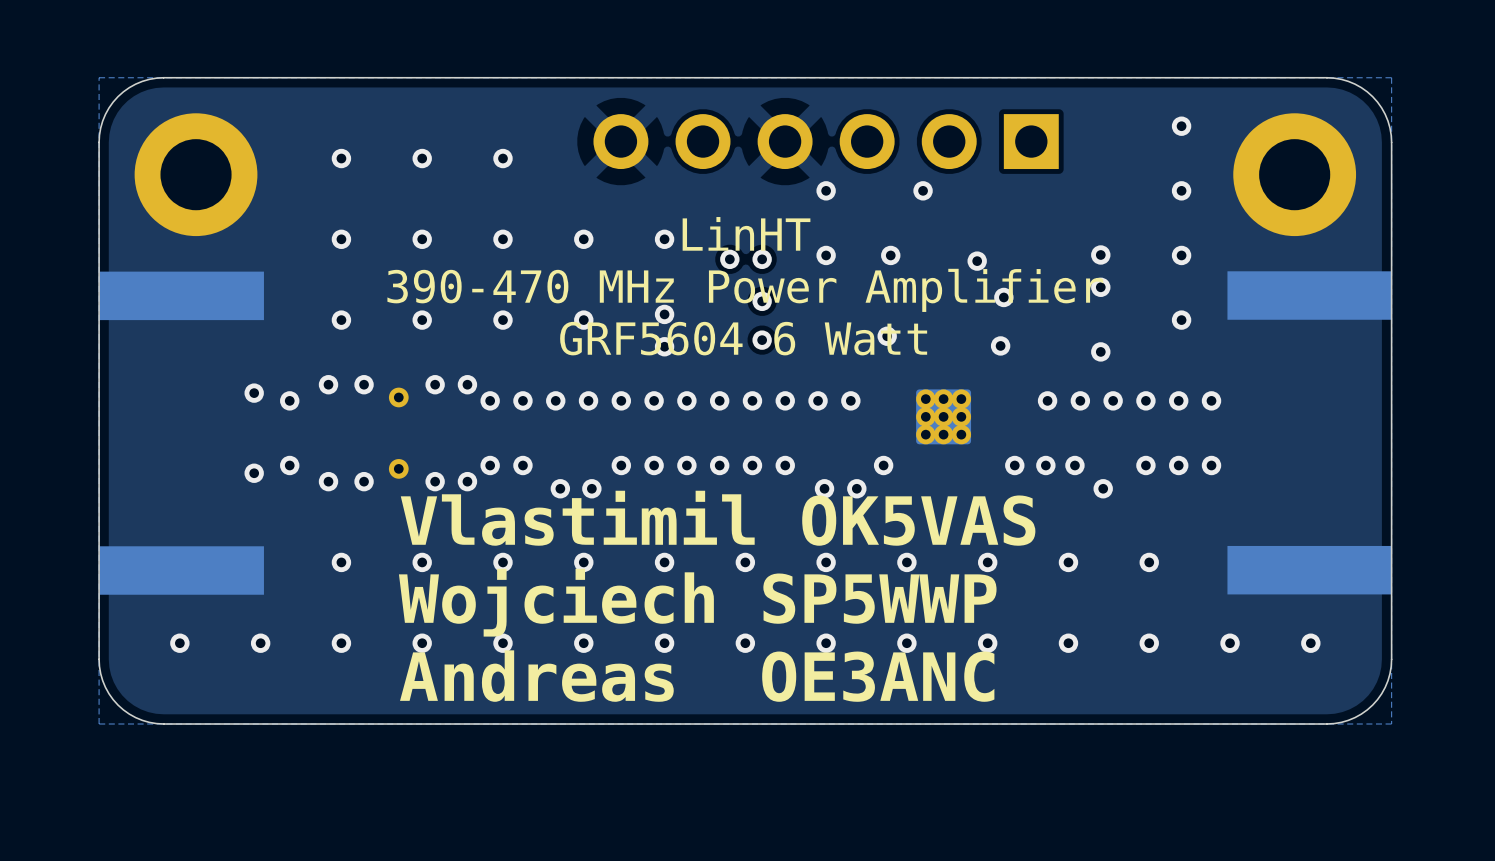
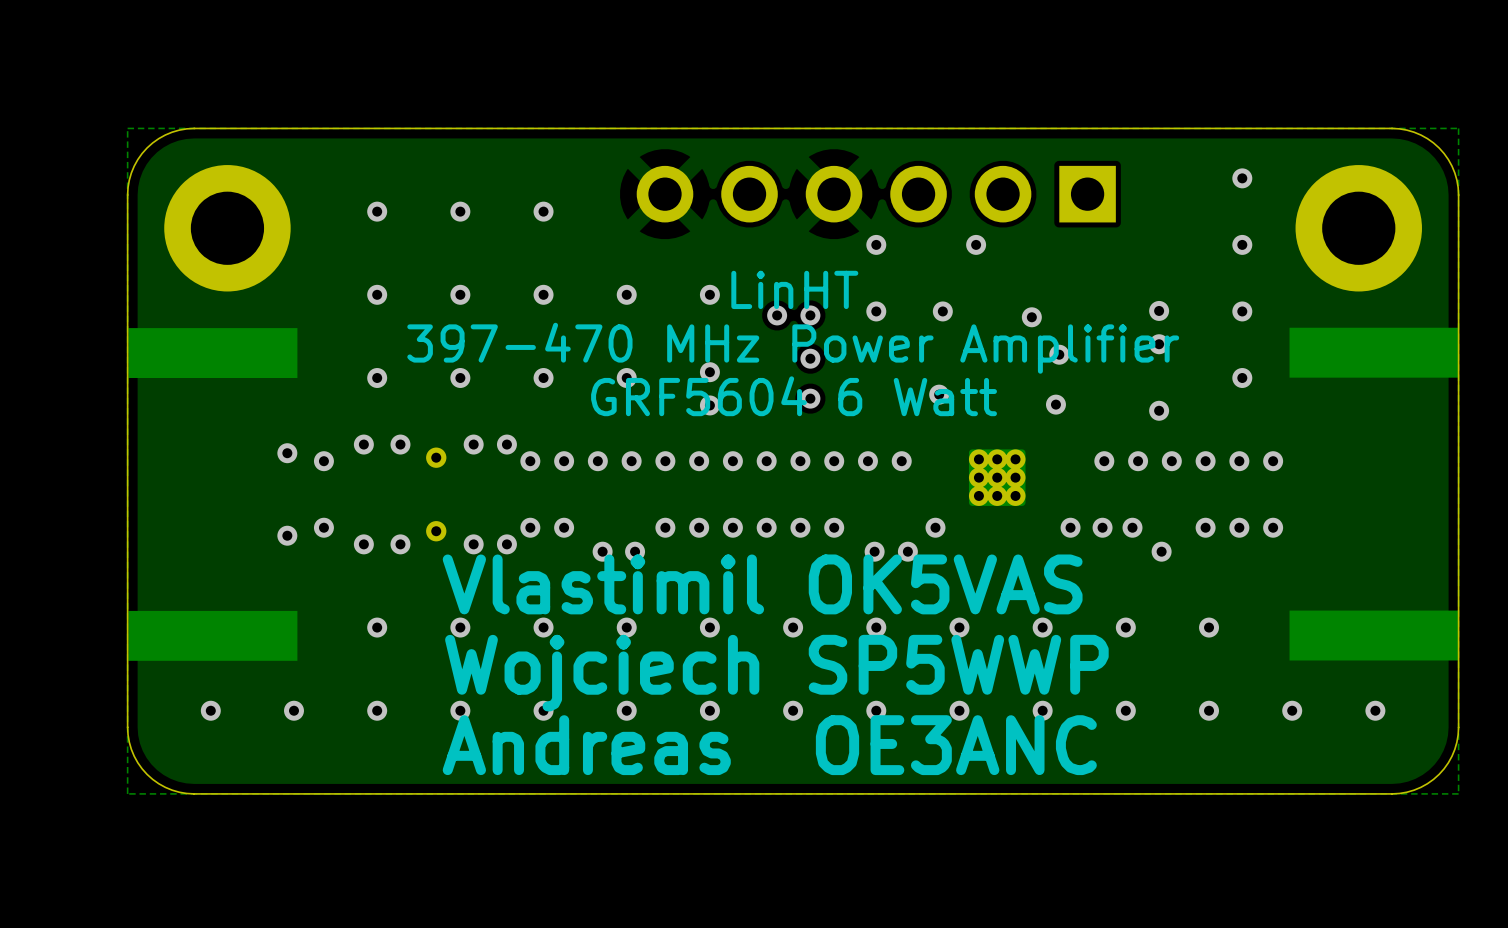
text: 390-470 MHz Power Amplifier (745, 290) -> 397-470 MHz Power Amplifier (793, 348)

